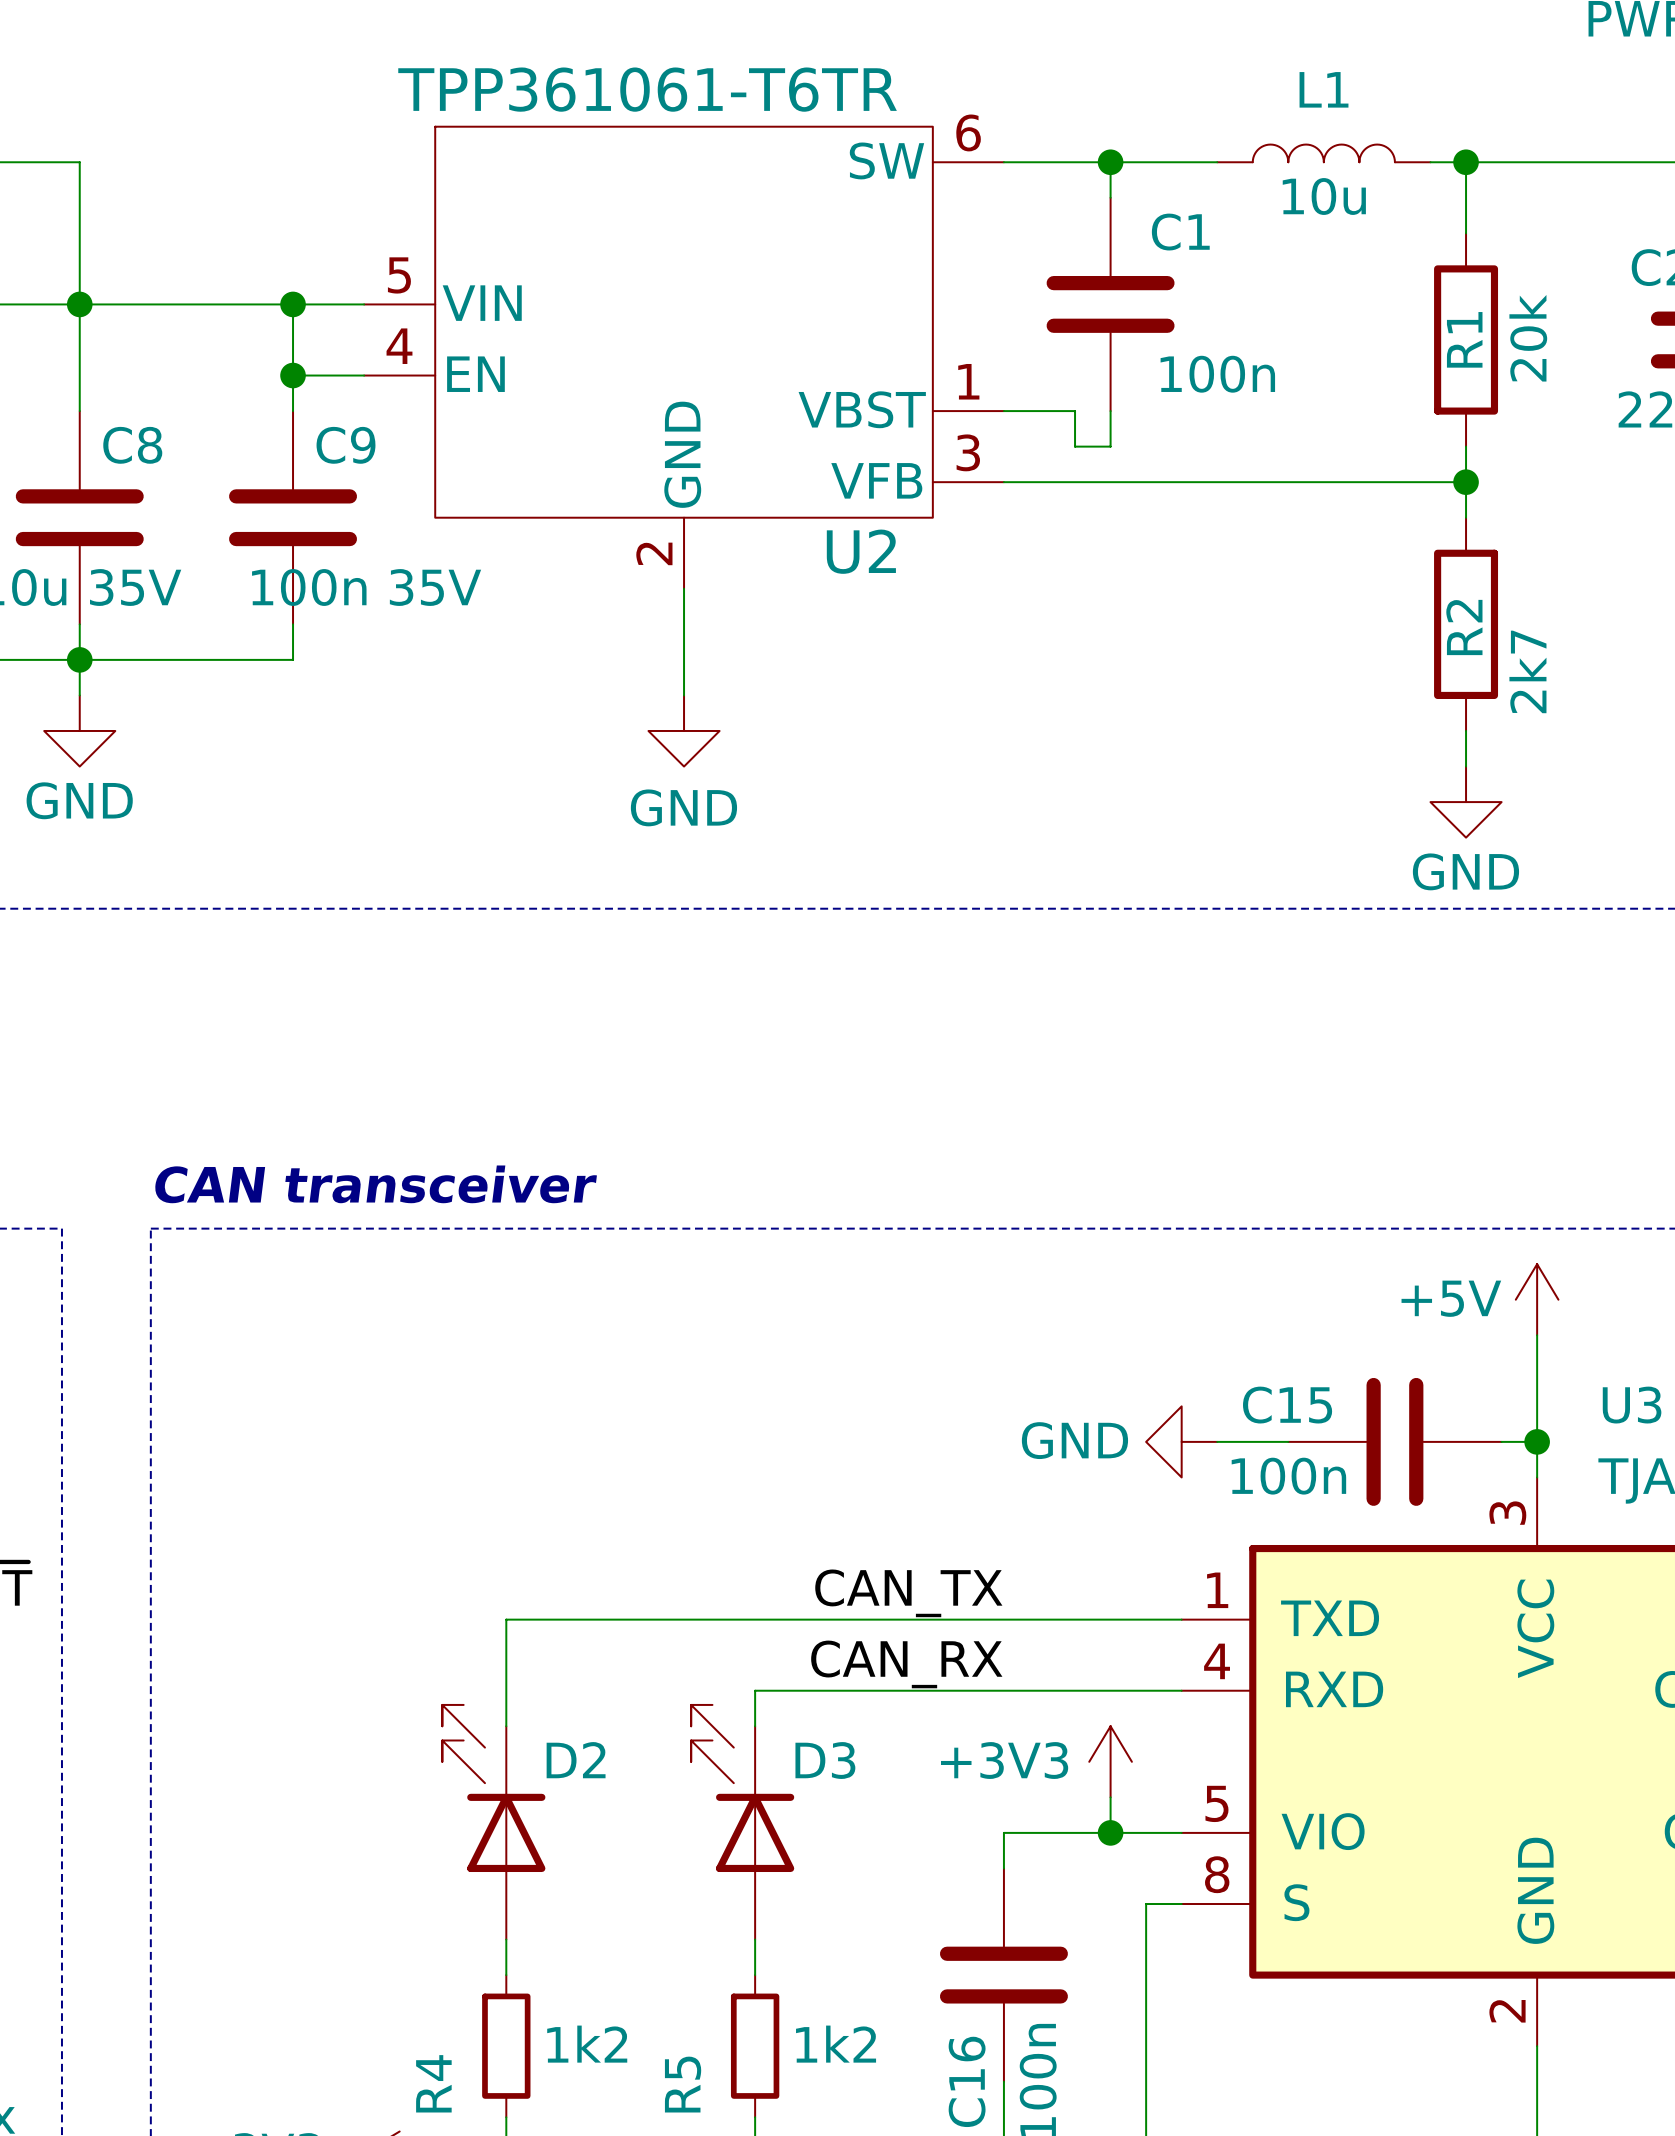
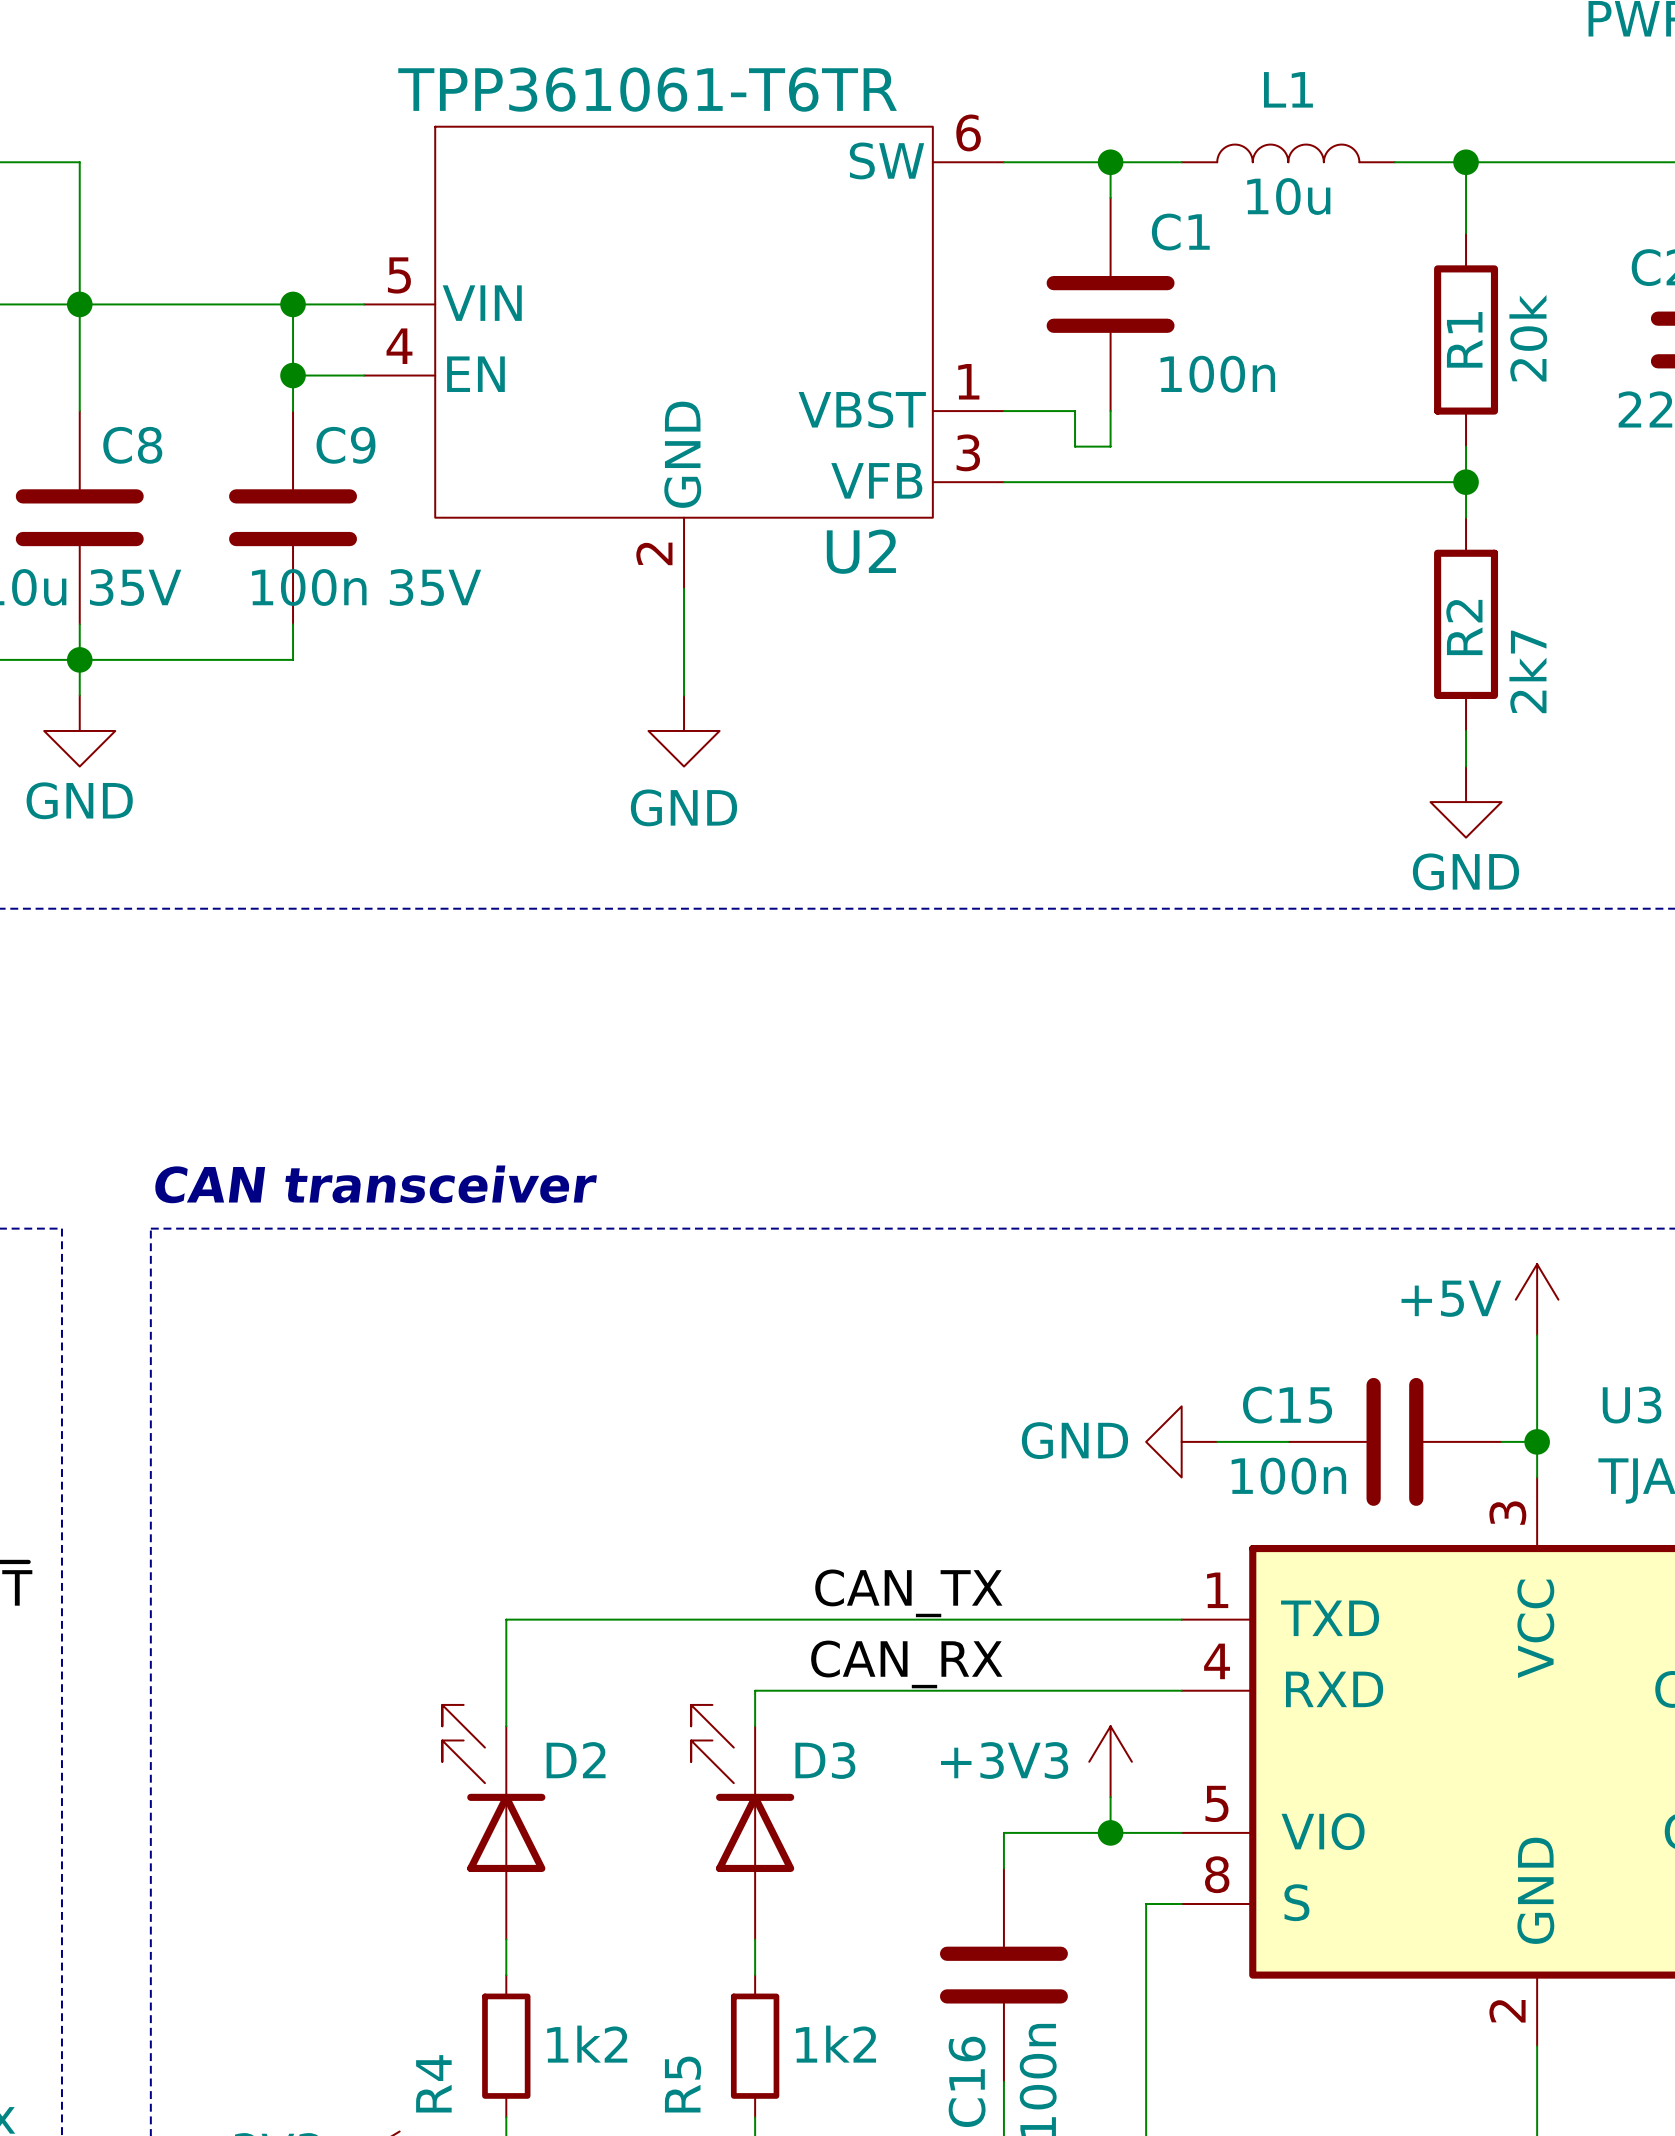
L1 position: (1323, 153) -> (1288, 153)

